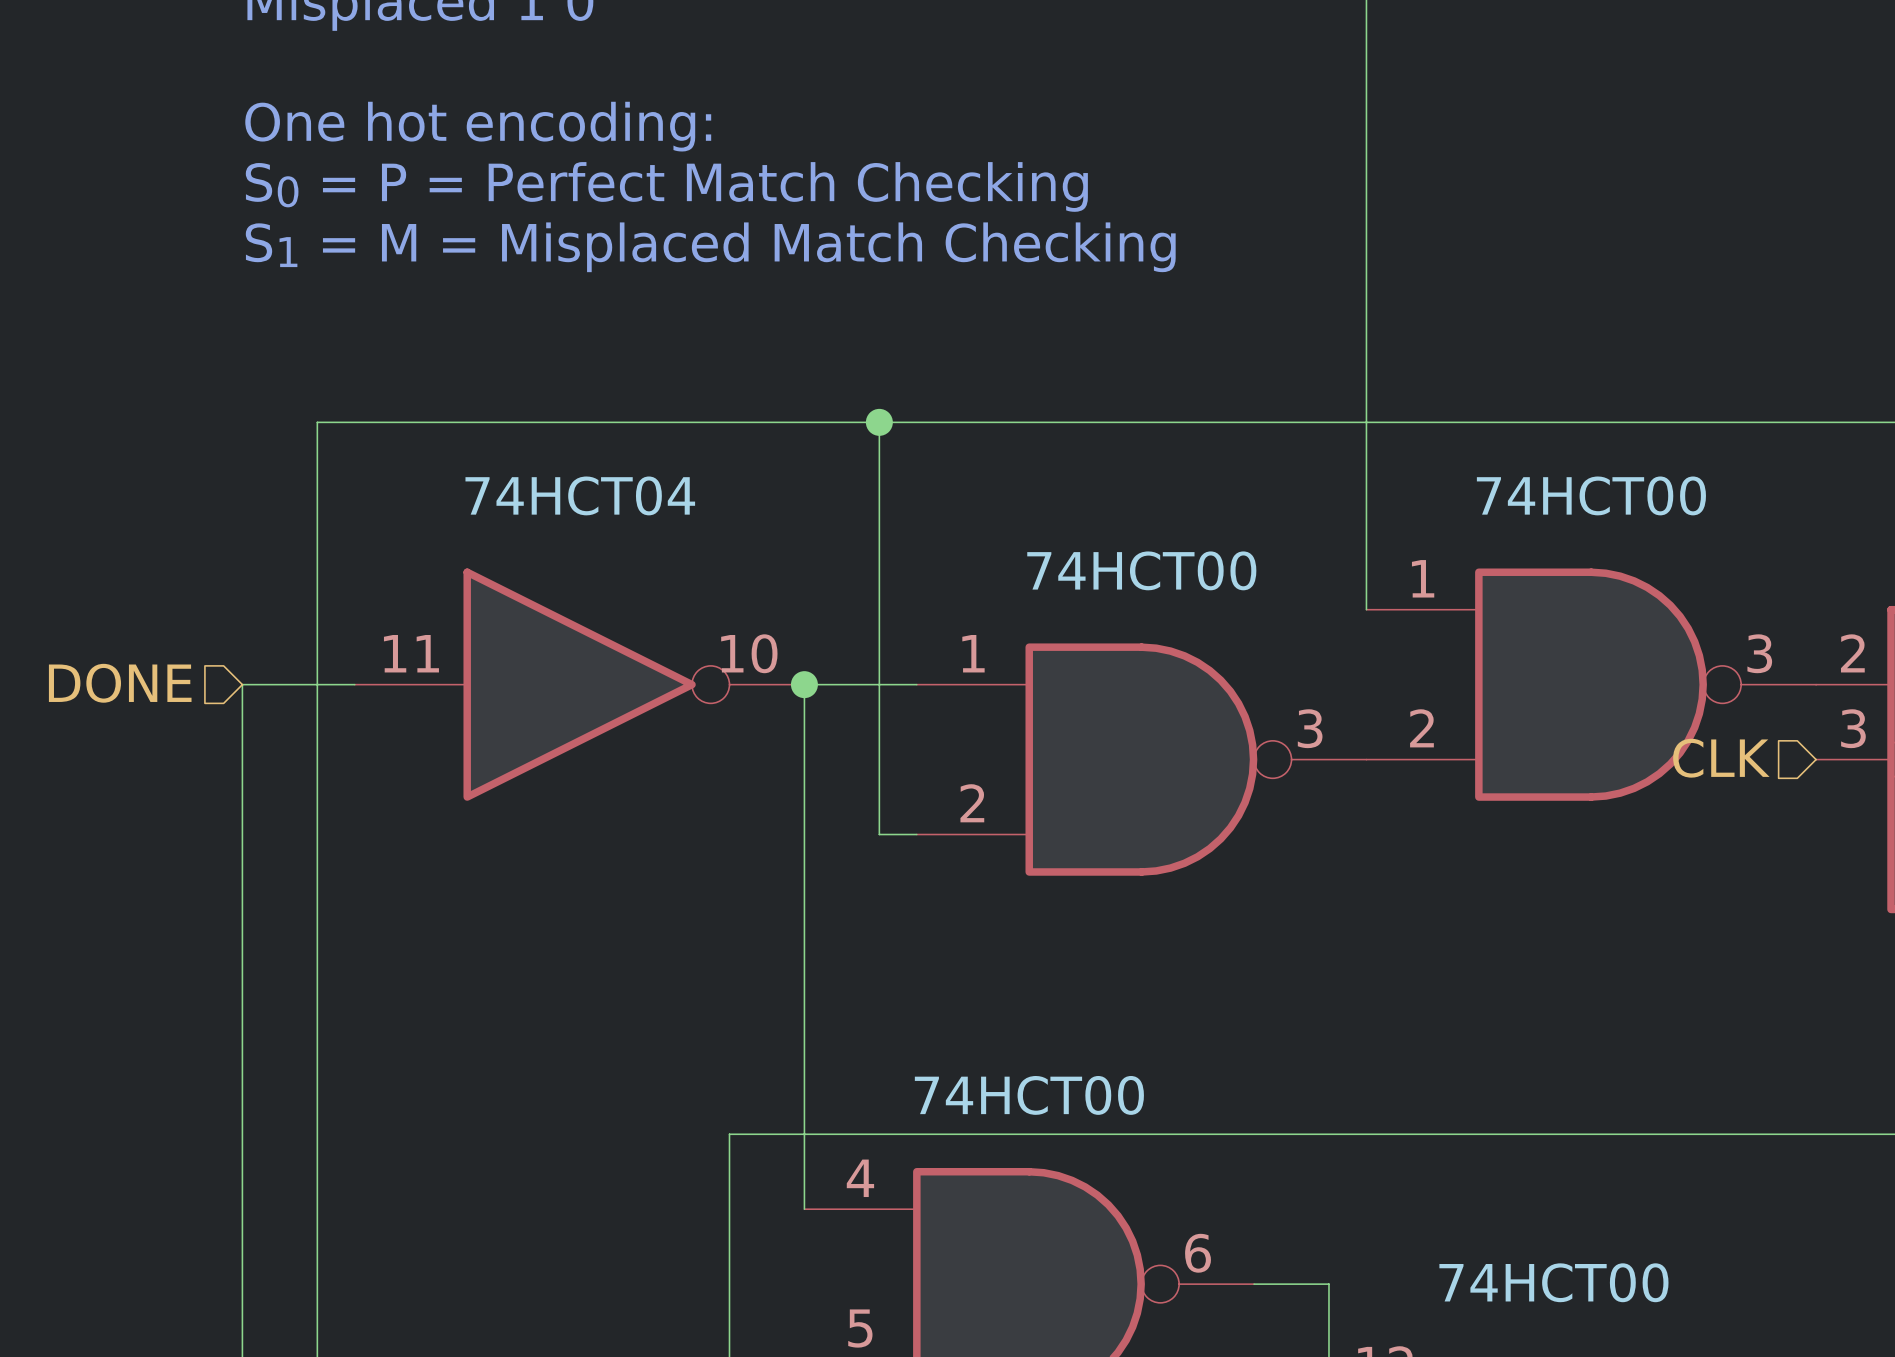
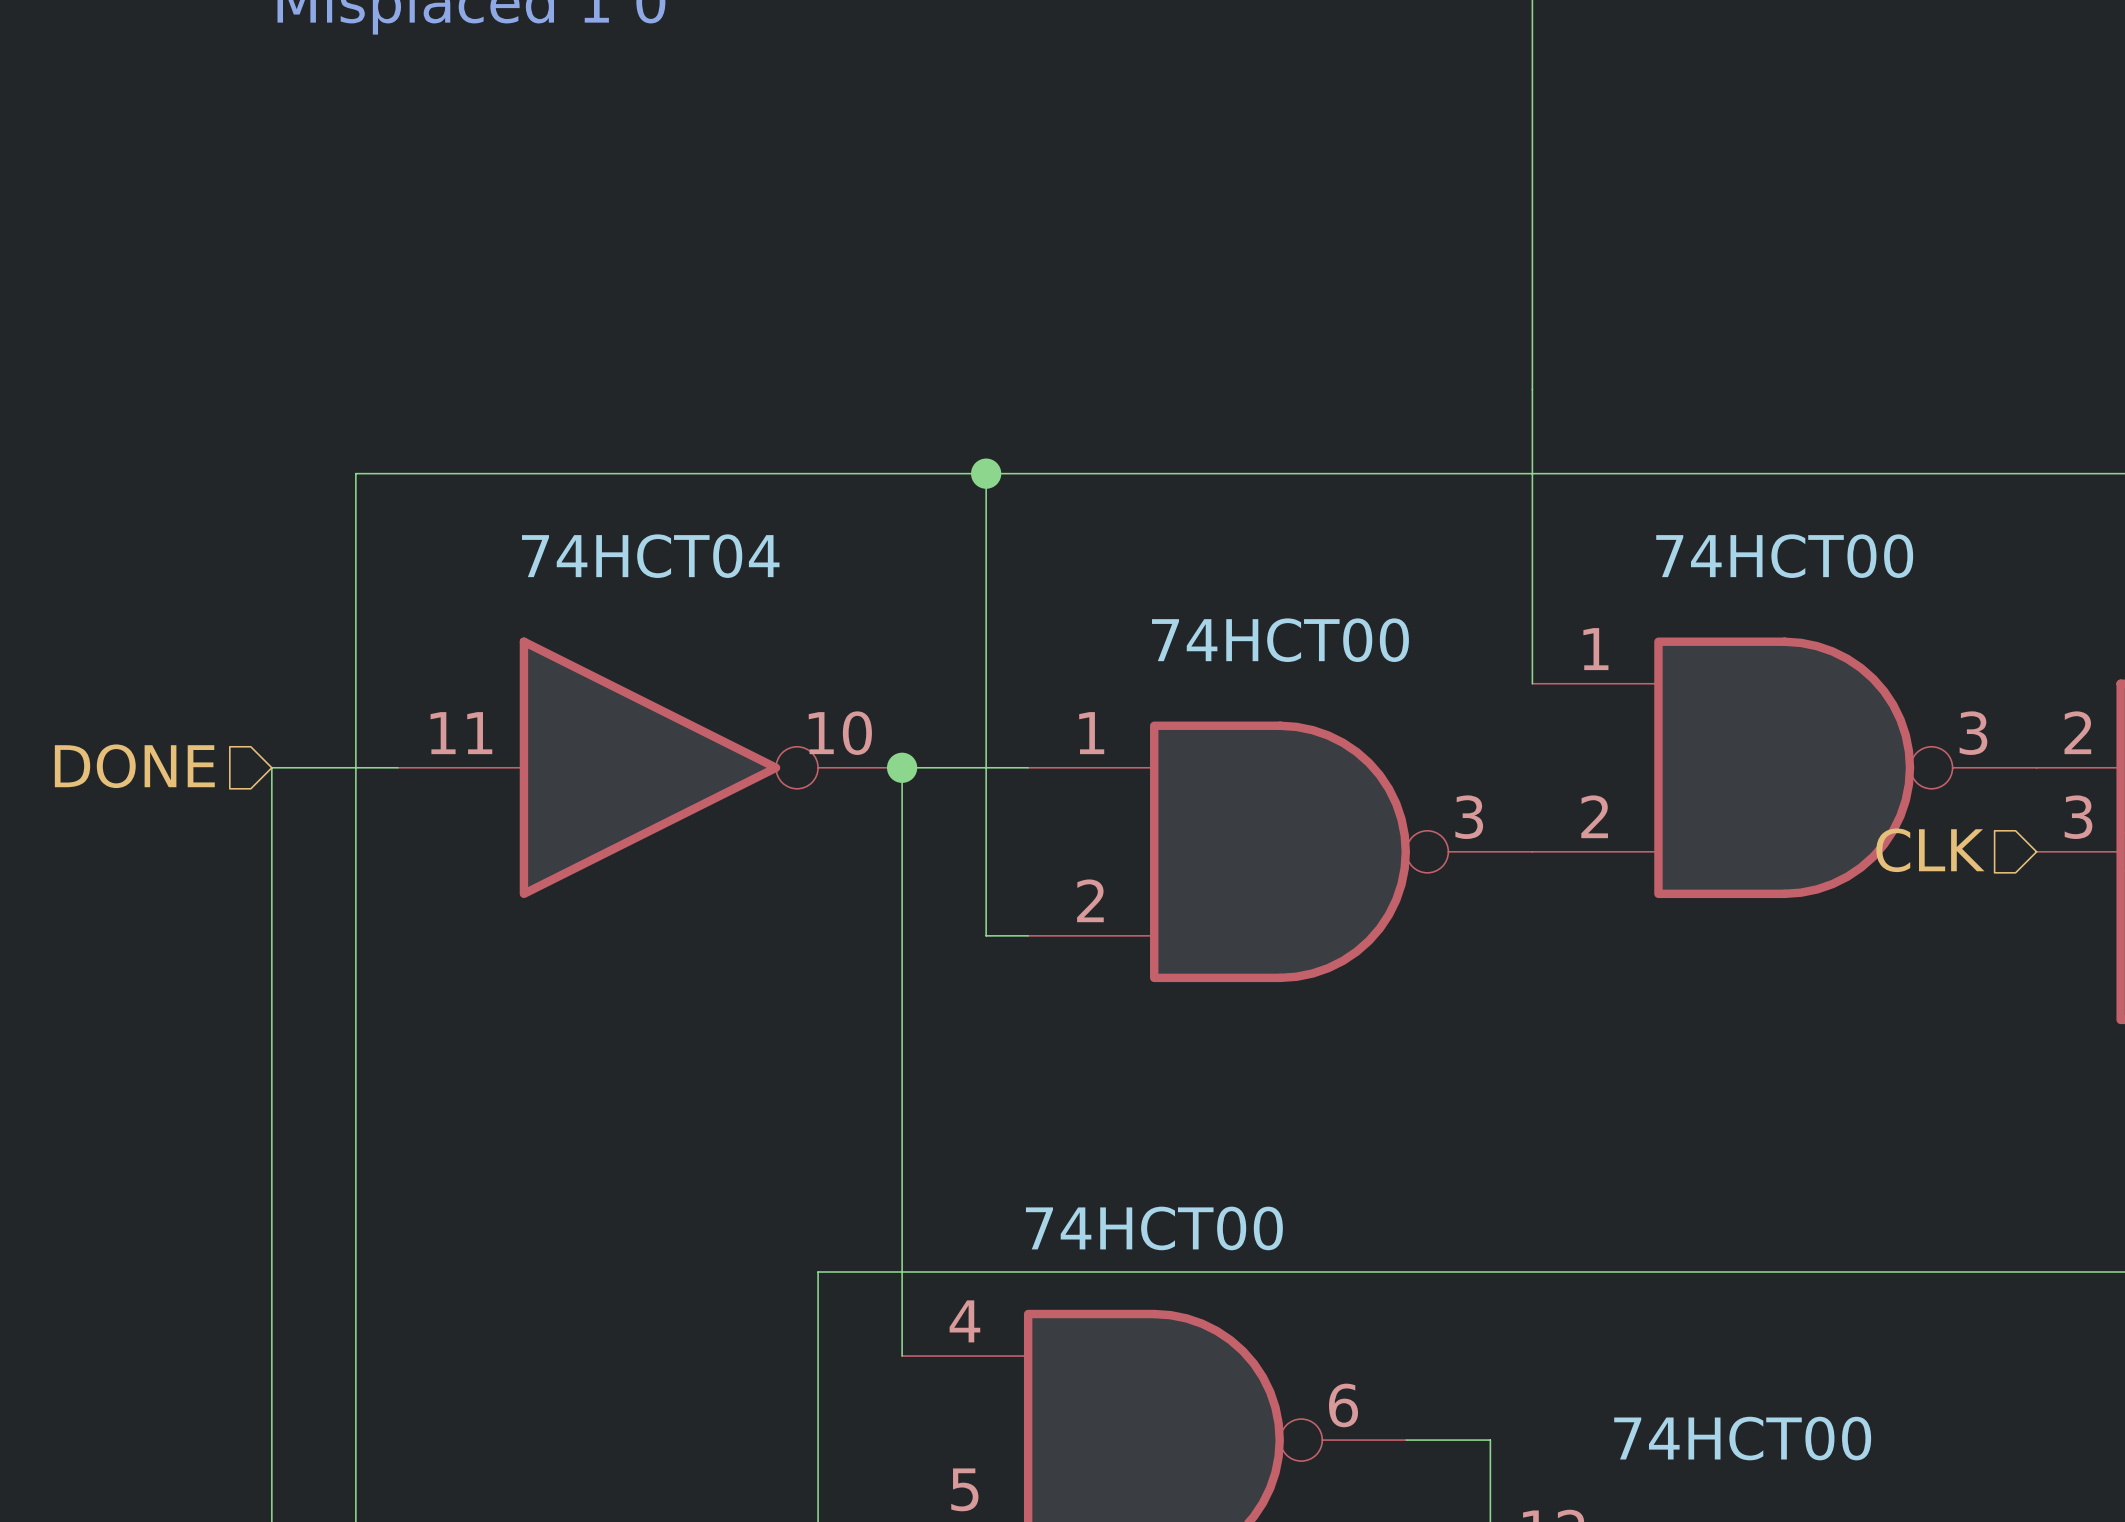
text: One hot encoding: (478, 126) -> none
text: S0 = P = Perfect Match Checking (666, 186) -> none
text: S1 = M = Misplaced Match Checking (710, 247) -> none

